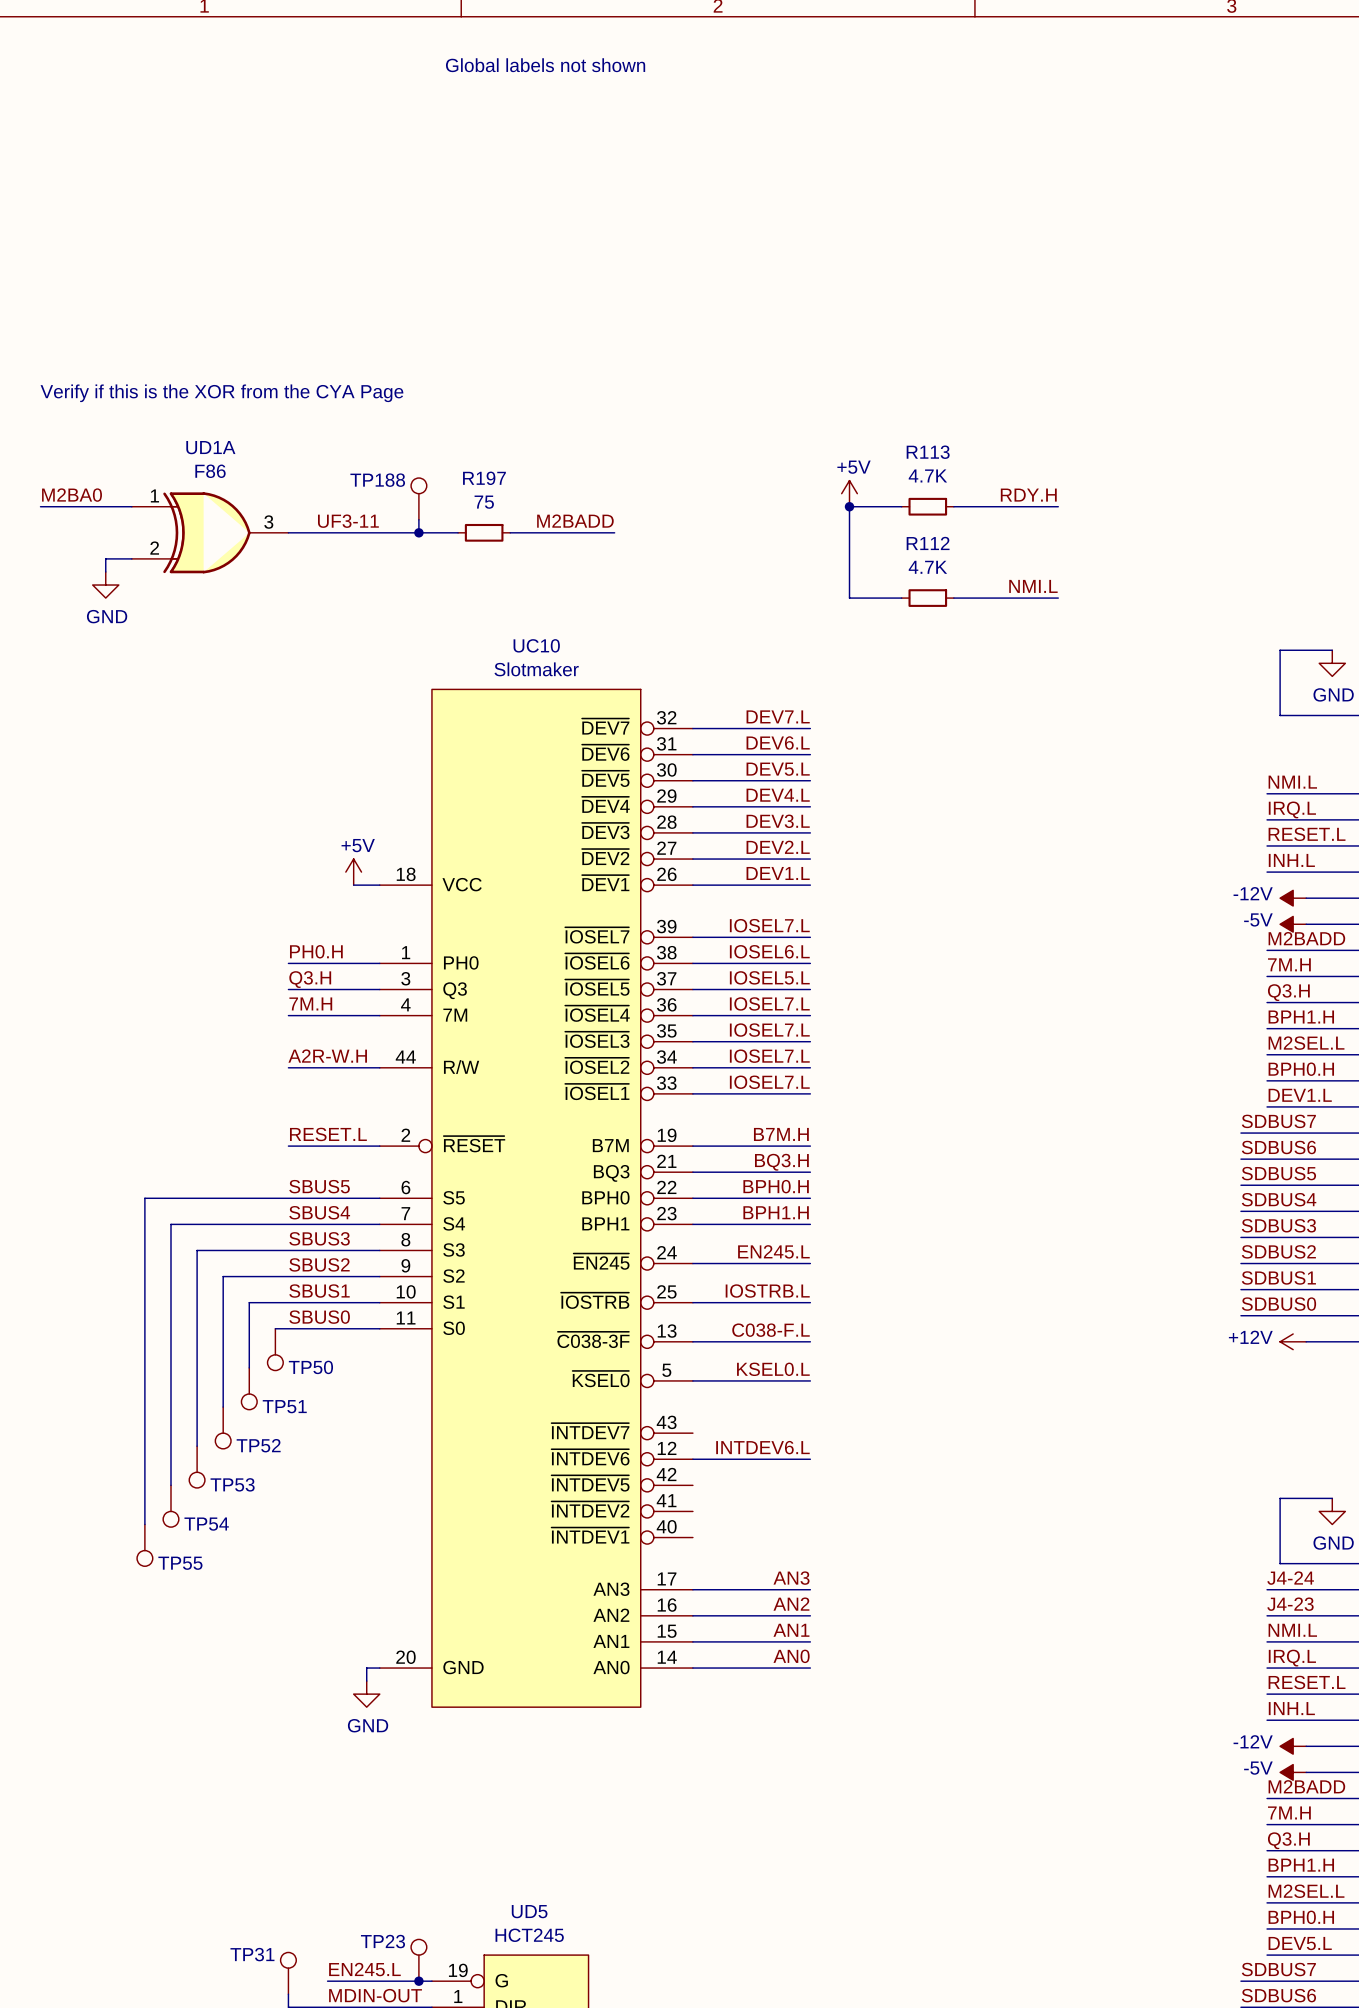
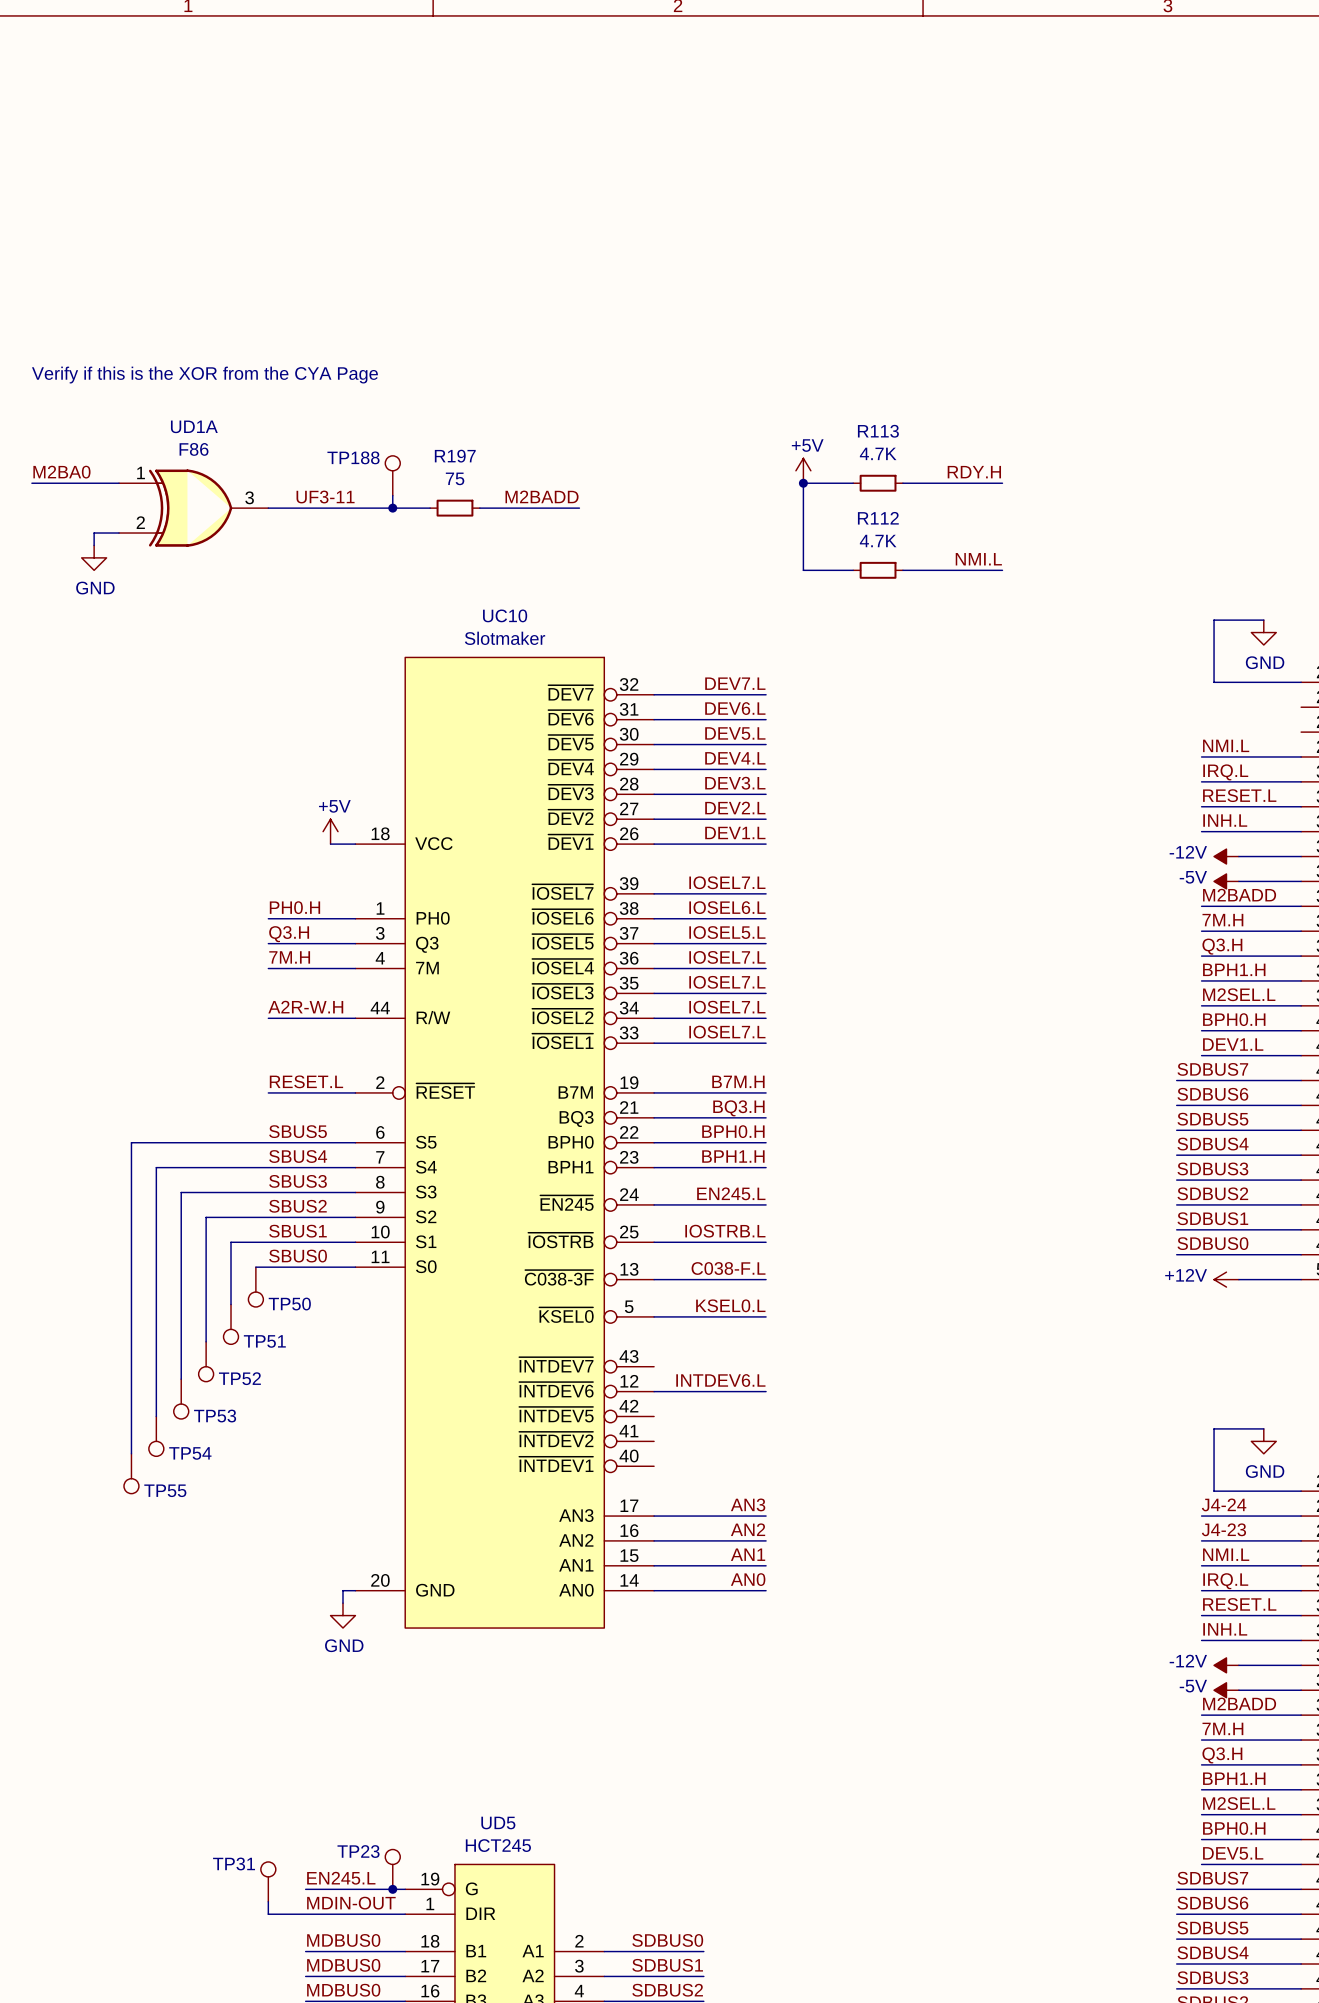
text: Global labels not shown (545, 65) -> none

